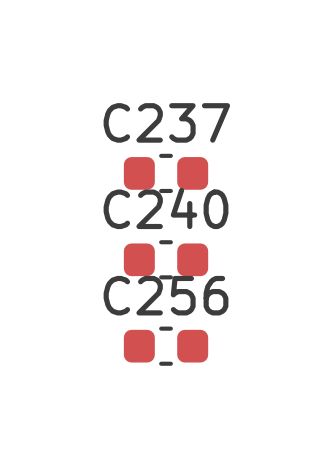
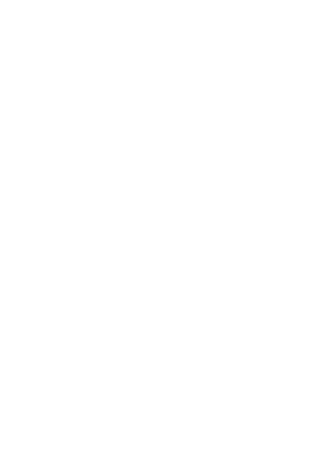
C237: (166, 173) -> none
C240: (166, 259) -> none
C256: (166, 346) -> none

